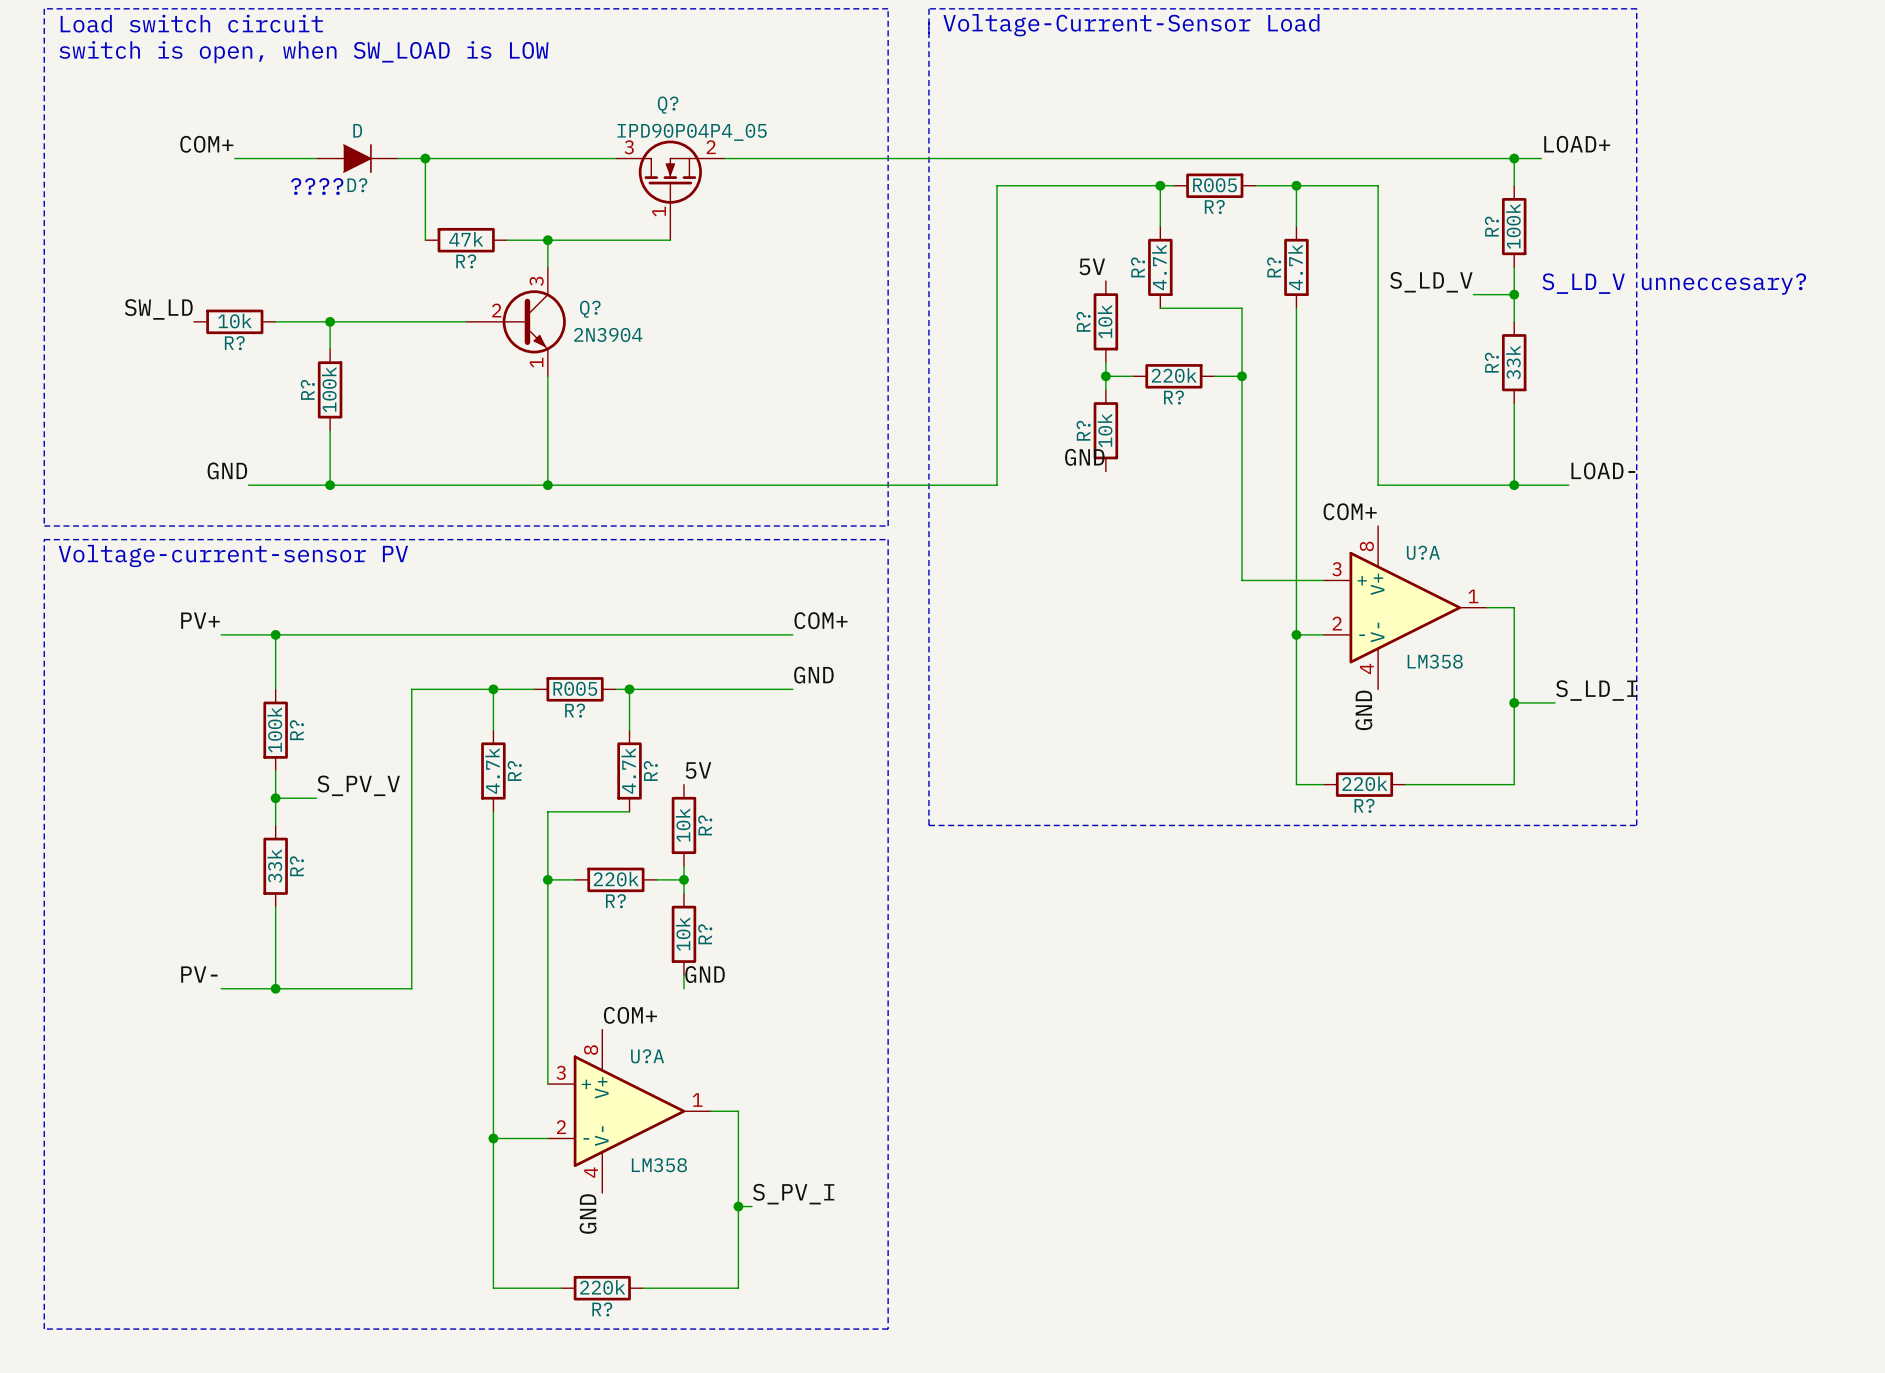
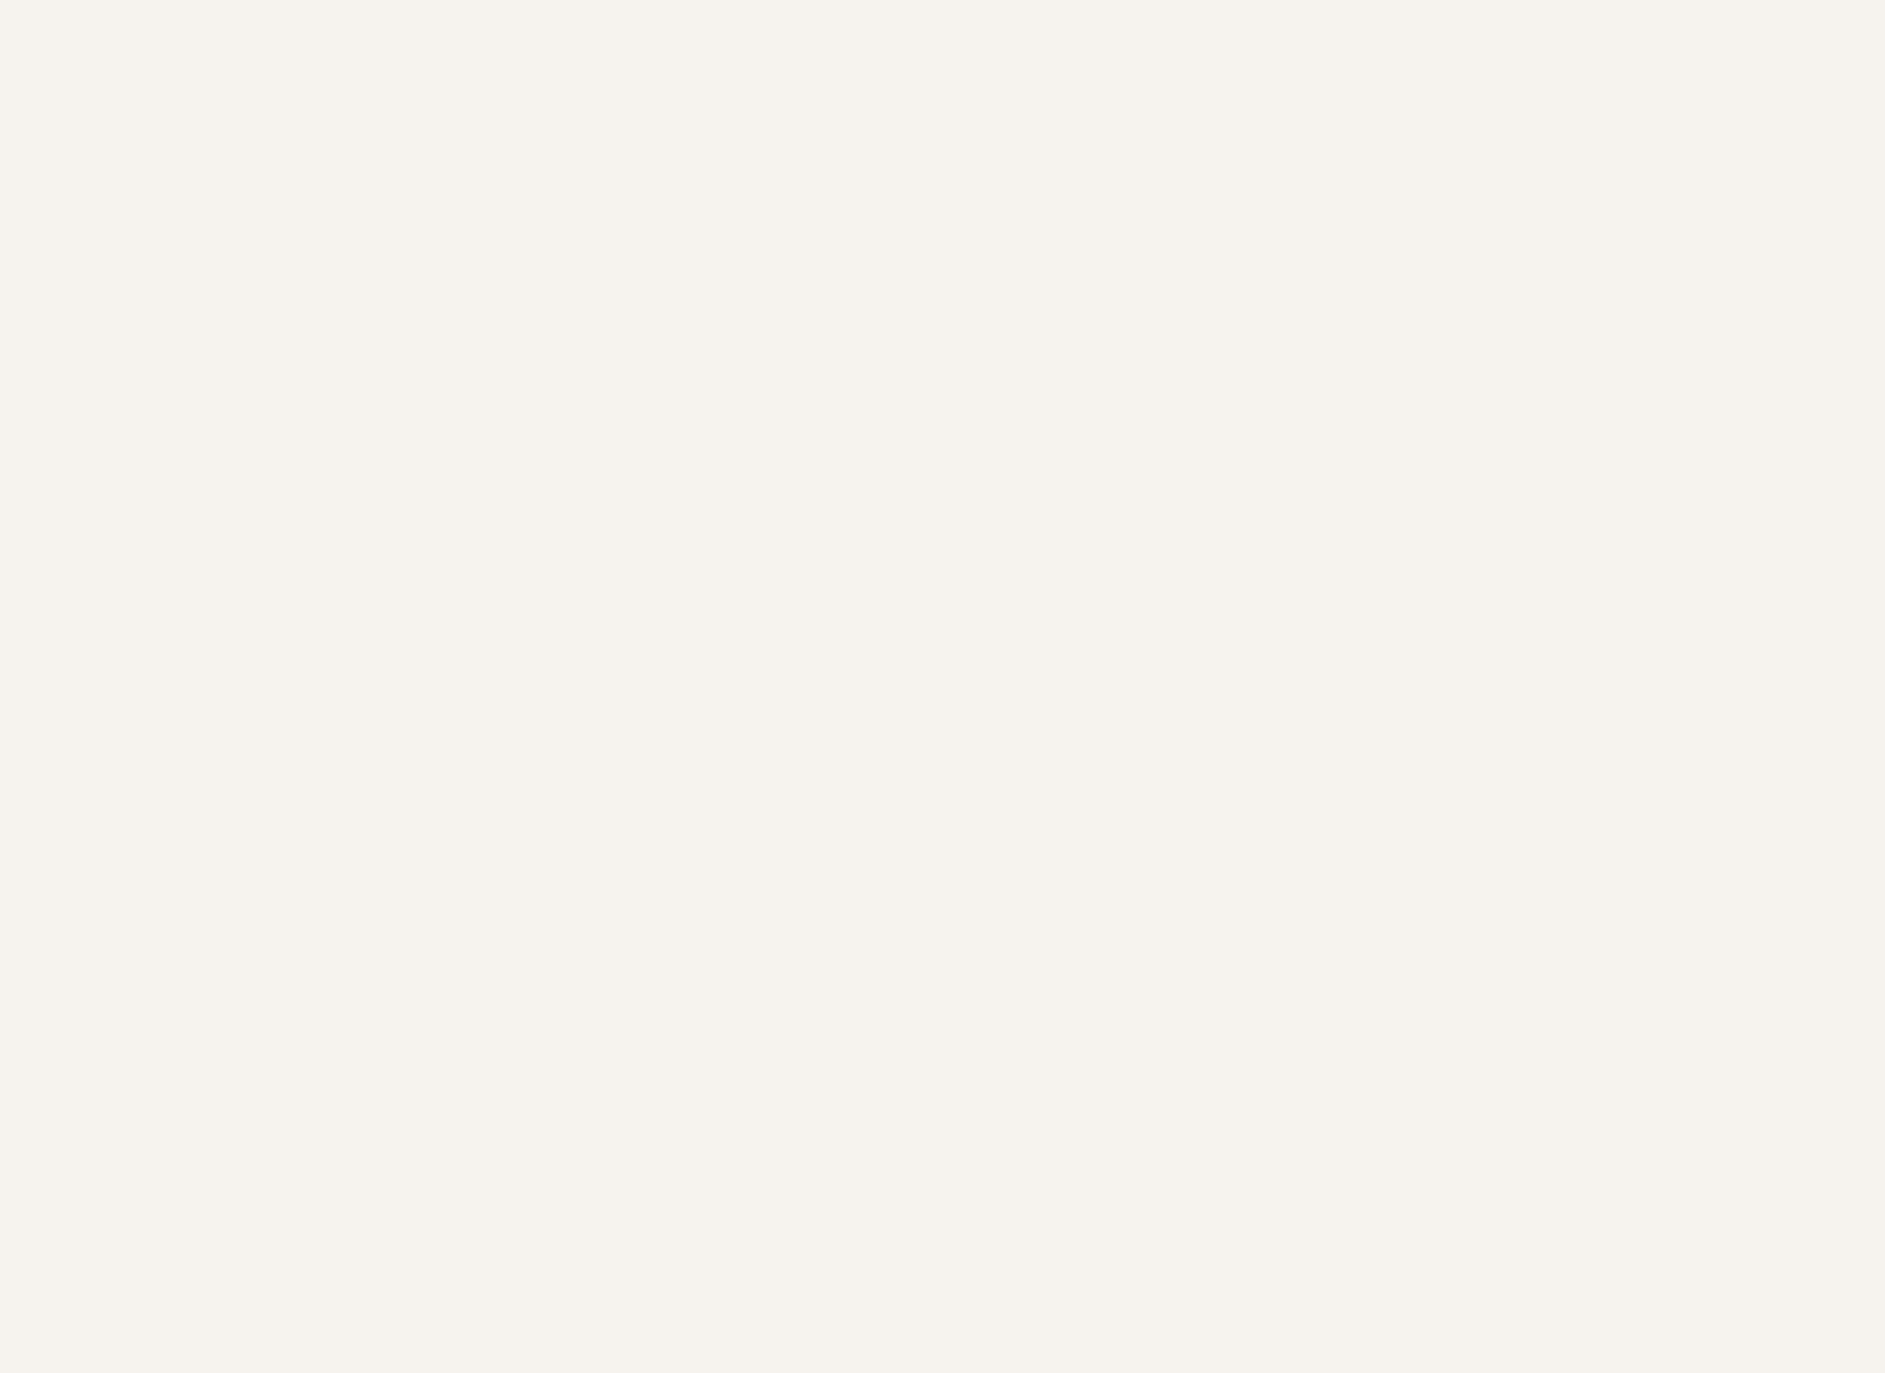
line: (44, 8) (44, 526) (888, 526) (888, 8) (44, 8) -> none
line: (928, 8) (1636, 8) (1636, 825) (928, 825) (928, 8) -> none
text: Load switch circuit (191, 23) -> none
text: Voltage-Current-Sensor Load (1131, 25) -> none
text: switch is open, when SW_LOAD is LOW (303, 52) -> none
label: COM+ (206, 144) -> none
label: LOAD+ (1577, 144) -> none
wire: (234, 158) (316, 158) -> none
D?: D (357, 158) -> none
wire: (398, 158) (615, 158) -> none
wire: (425, 158) (425, 240) -> none
junction: (425, 158) -> none
wire: (724, 158) (1541, 158) -> none
wire: (1514, 158) (1514, 185) -> none
junction: (1514, 158) -> none
wire: (1160, 185) (1160, 226) -> none
junction: (1160, 185) -> none
wire: (1173, 185) (997, 185) (997, 485) (248, 485) -> none
R?: R005 (1214, 185) -> none
wire: (1255, 185) (1378, 185) (1378, 485) (1568, 485) -> none
wire: (1296, 185) (1296, 226) -> none
junction: (1296, 185) -> none
text: ???? (317, 186) -> none
Q?: IPD90P04P4_05 (670, 190) -> none
R?: 100k (1514, 226) -> none
R?: 47k (466, 240) -> none
wire: (507, 240) (670, 240) -> none
wire: (547, 240) (547, 267) -> none
junction: (547, 240) -> none
label: 5V (1092, 266) -> none
R?: 4.7k (1160, 267) -> none
R?: 4.7k (1296, 267) -> none
wire: (1514, 267) (1514, 321) -> none
label: S_LD_V (1431, 282) -> none
text: S_LD_V unneccesary? (1674, 283) -> none
wire: (1473, 294) (1514, 294) -> none
junction: (1514, 294) -> none
wire: (1160, 308) (1242, 308) (1242, 580) (1323, 580) -> none
wire: (1296, 308) (1296, 784) (1323, 784) -> none
label: SW_LD (158, 309) -> none
R?: 10k (234, 321) -> none
wire: (275, 321) (466, 321) -> none
wire: (330, 321) (330, 349) -> none
junction: (330, 321) -> none
Q?: 2N3904 (516, 321) -> none
R?: 10k (1105, 321) -> none
wire: (1105, 362) (1105, 389) -> none
R?: 33k (1514, 362) -> none
wire: (547, 376) (547, 485) -> none
wire: (1105, 376) (1133, 376) -> none
junction: (1105, 376) -> none
R?: 220k (1173, 376) -> none
wire: (1214, 376) (1242, 376) -> none
junction: (1242, 376) -> none
R?: 100k (330, 389) -> none
wire: (1514, 403) (1514, 485) -> none
wire: (330, 430) (330, 485) -> none
R?: 10k (1105, 430) -> none
label: GND (1084, 457) -> none
label: GND (227, 470) -> none
label: LOAD- (1603, 470) -> none
junction: (330, 485) -> none
junction: (547, 485) -> none
junction: (1514, 485) -> none
label: COM+ (1350, 511) -> none
line: (44, 539) (44, 1329) (888, 1329) (888, 539) (44, 539) -> none
text: Voltage-current-sensor PV (233, 555) -> none
U?A: LM358 (1405, 607) -> none
wire: (1486, 607) (1514, 607) (1514, 784) (1405, 784) -> none
label: PV+ (200, 620) -> none
label: COM+ (821, 620) -> none
wire: (221, 634) (792, 634) -> none
wire: (275, 634) (275, 689) -> none
junction: (275, 634) -> none
wire: (1296, 634) (1323, 634) -> none
junction: (1296, 634) -> none
label: GND (813, 675) -> none
wire: (493, 689) (493, 730) -> none
junction: (493, 689) -> none
wire: (534, 689) (411, 689) (411, 988) (221, 988) -> none
R?: R005 (575, 689) -> none
wire: (615, 689) (792, 689) -> none
wire: (629, 689) (629, 730) -> none
junction: (629, 689) -> none
label: S_LD_I (1596, 690) -> none
wire: (1514, 702) (1555, 702) -> none
junction: (1514, 702) -> none
label: GND (1363, 710) -> none
R?: 100k (275, 730) -> none
label: 5V (698, 770) -> none
wire: (275, 771) (275, 825) -> none
R?: 4.7k (493, 771) -> none
R?: 4.7k (629, 771) -> none
R?: 220k (1364, 784) -> none
label: S_PV_V (358, 785) -> none
wire: (275, 798) (316, 798) -> none
junction: (275, 798) -> none
wire: (493, 811) (493, 1288) (561, 1288) -> none
wire: (629, 811) (547, 811) (547, 1084) -> none
R?: 10k (683, 825) -> none
R?: 33k (275, 866) -> none
wire: (683, 866) (683, 893) -> none
wire: (547, 879) (575, 879) -> none
junction: (547, 879) -> none
R?: 220k (615, 879) -> none
wire: (656, 879) (683, 879) -> none
junction: (683, 879) -> none
wire: (275, 907) (275, 988) -> none
R?: 10k (683, 934) -> none
label: PV- (199, 974) -> none
label: GND (705, 974) -> none
wire: (683, 975) (683, 988) -> none
junction: (275, 988) -> none
label: COM+ (630, 1015) -> none
U?A: LM358 (629, 1111) -> none
wire: (711, 1111) (738, 1111) (738, 1288) (643, 1288) -> none
wire: (493, 1138) (547, 1138) -> none
junction: (493, 1138) -> none
label: S_PV_I (793, 1194) -> none
wire: (738, 1206) (752, 1206) -> none
junction: (738, 1206) -> none
label: GND (588, 1214) -> none
R?: 220k (602, 1288) -> none

